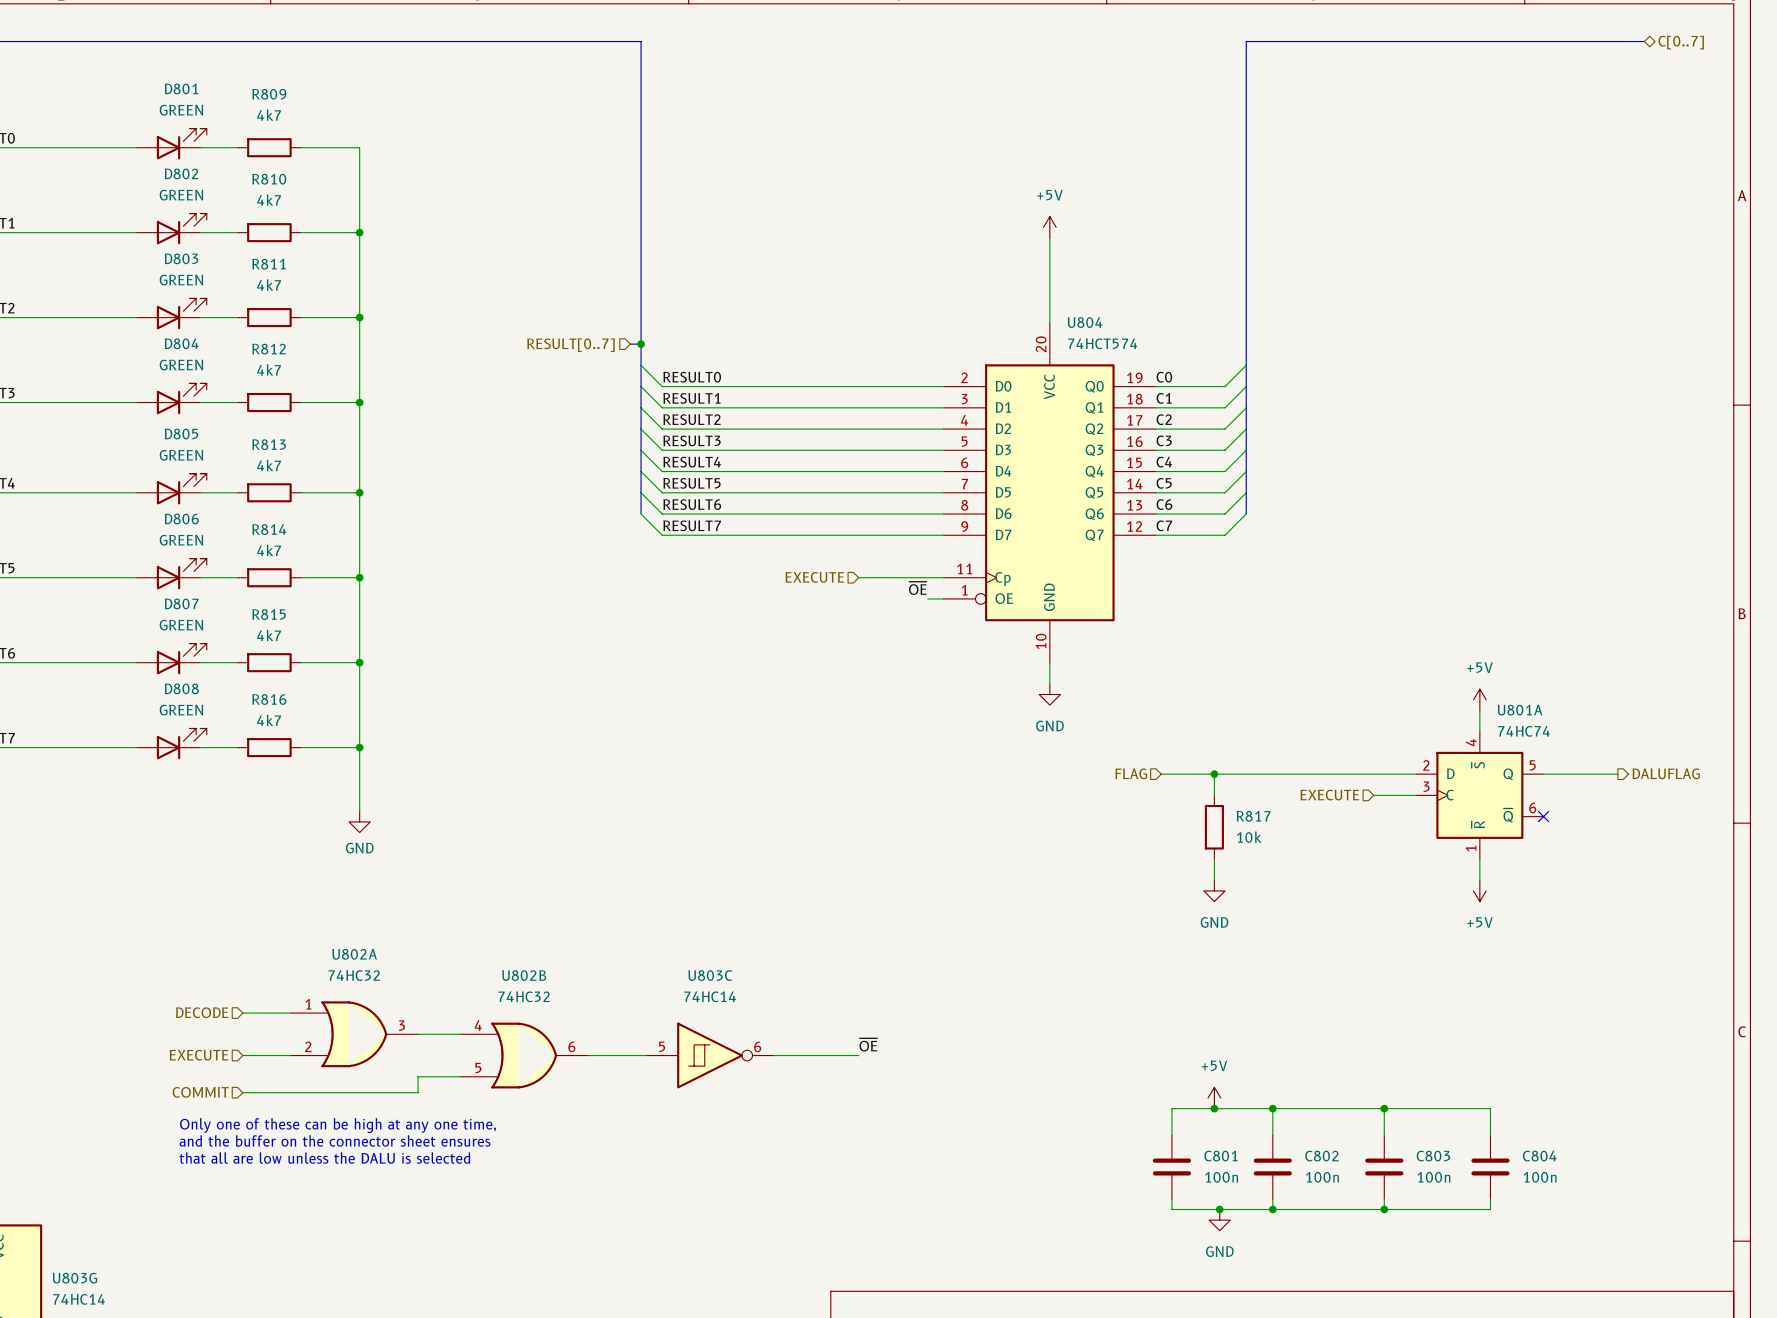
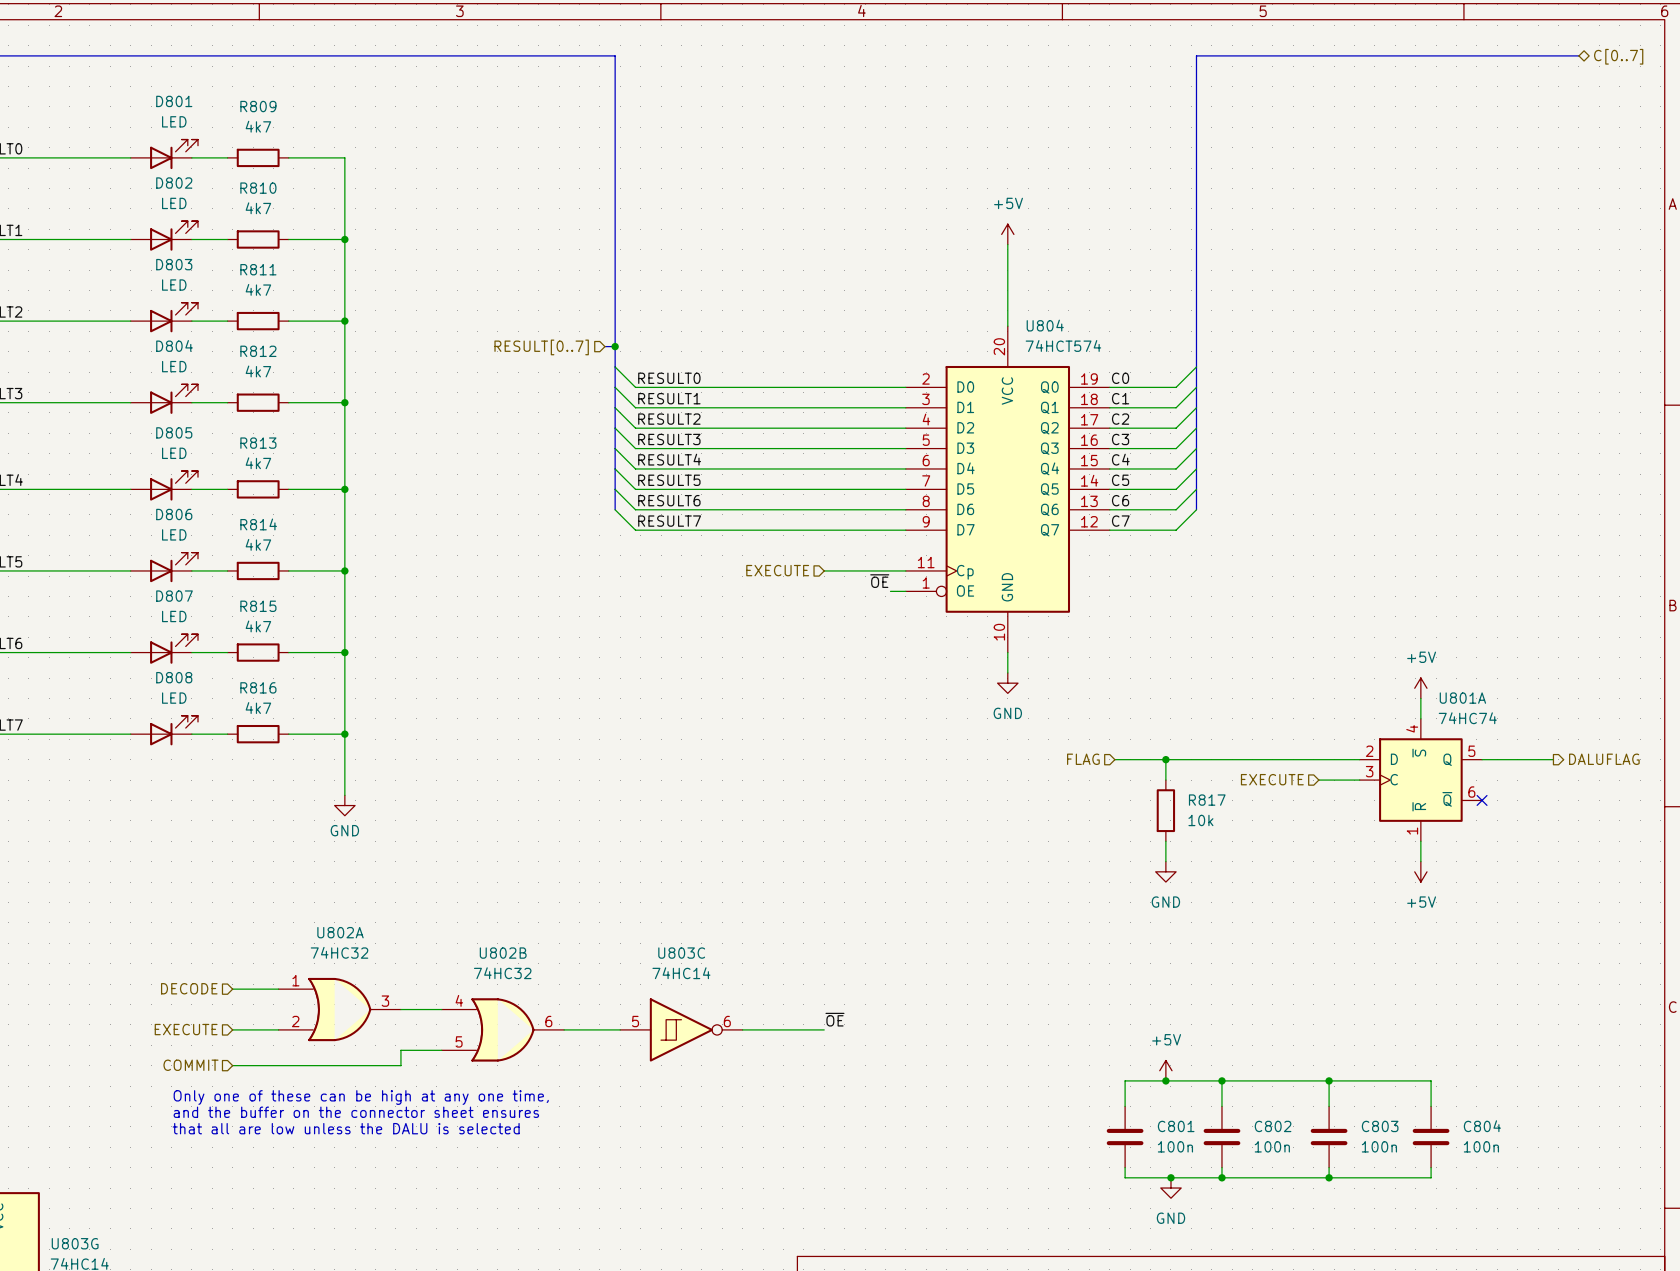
D801 value: GREEN (181, 110) -> LED (174, 121)
D802 value: GREEN (181, 195) -> LED (174, 203)
D803 value: GREEN (181, 280) -> LED (174, 285)
D804 value: GREEN (181, 365) -> LED (174, 366)
D805 value: GREEN (181, 455) -> LED (174, 453)
D806 value: GREEN (181, 540) -> LED (174, 534)
D807 value: GREEN (181, 625) -> LED (174, 616)
D808 value: GREEN (181, 710) -> LED (174, 698)

